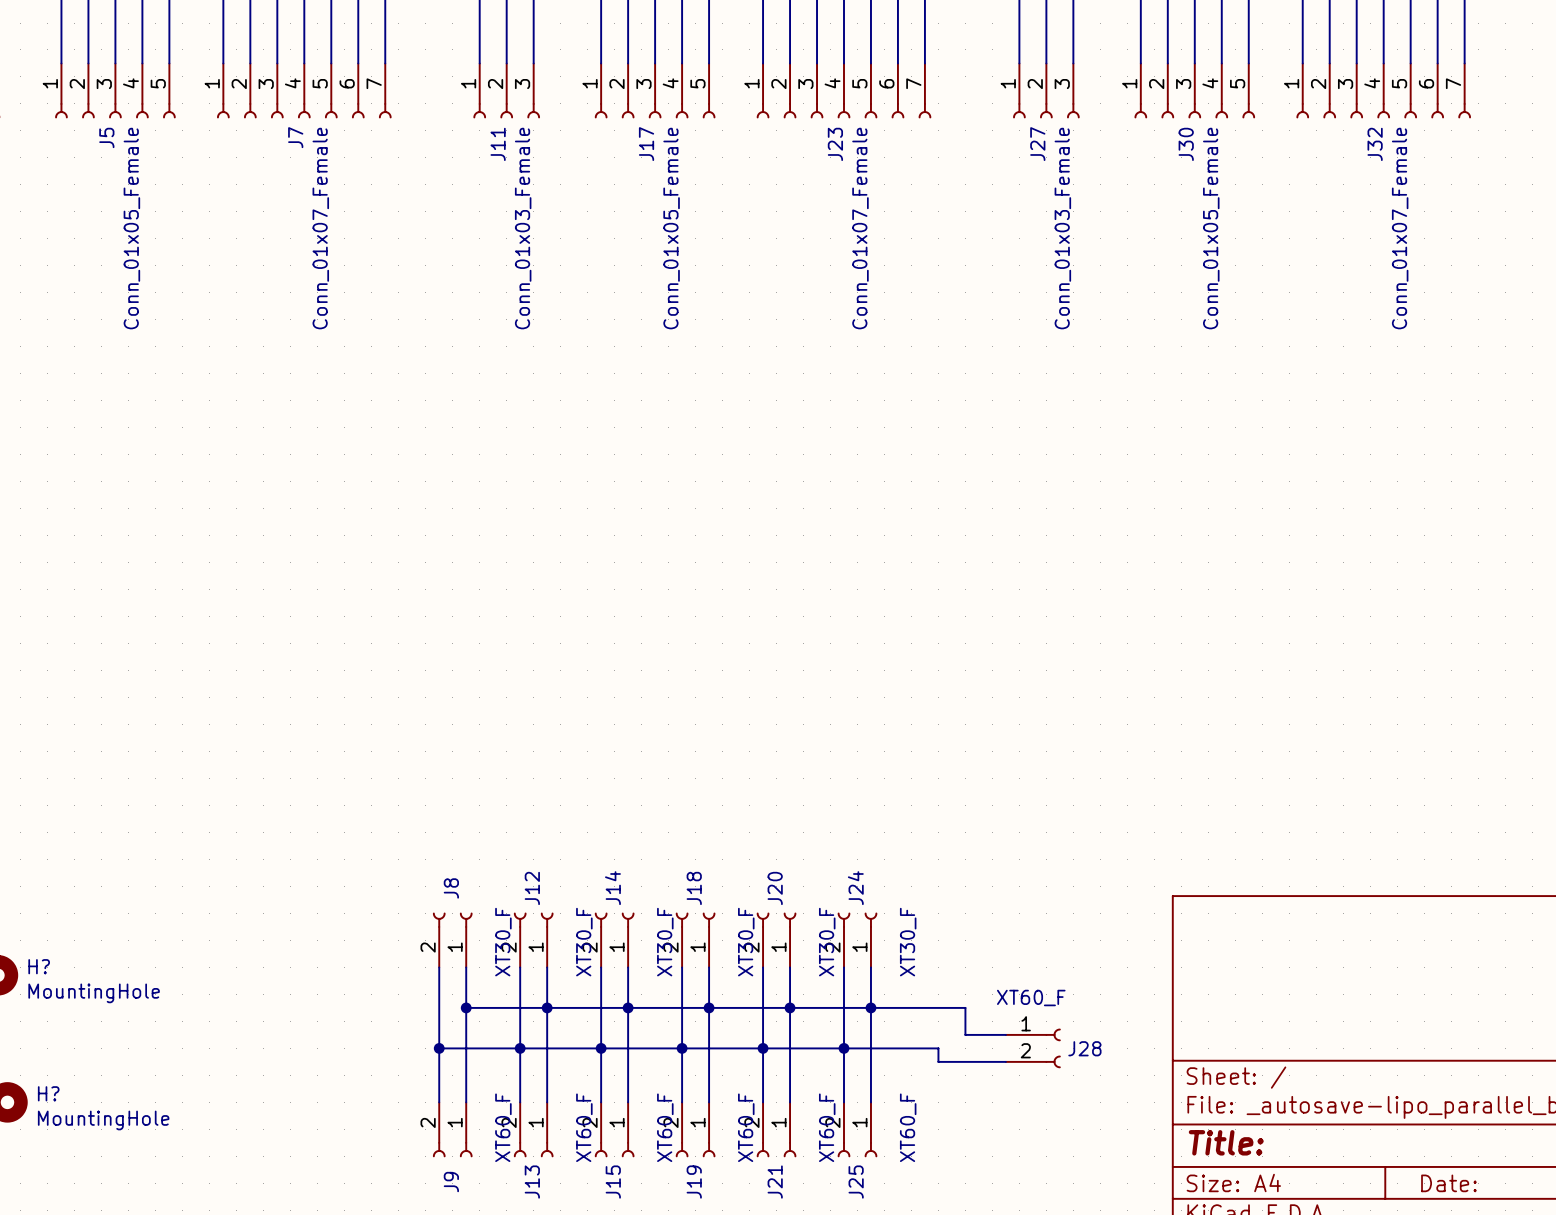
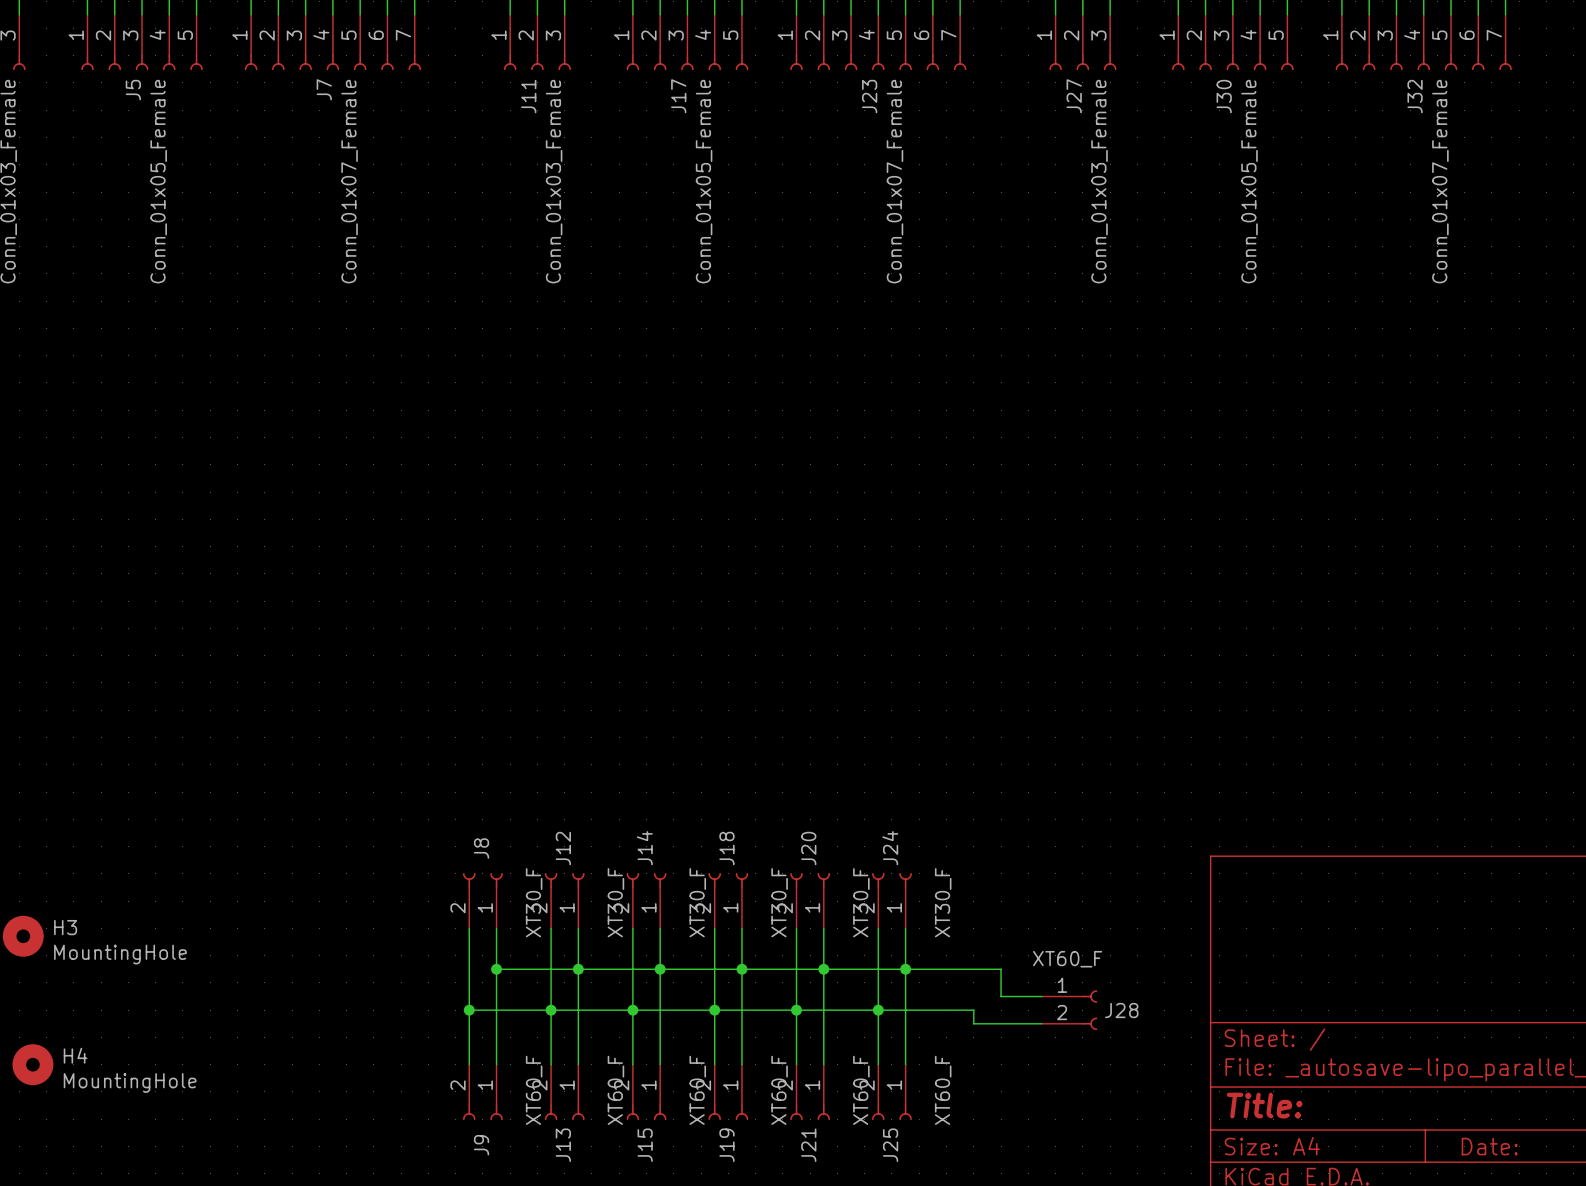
H? name: H? (39, 966) -> H3 (65, 927)
H? name: H? (48, 1093) -> H4 (75, 1055)

